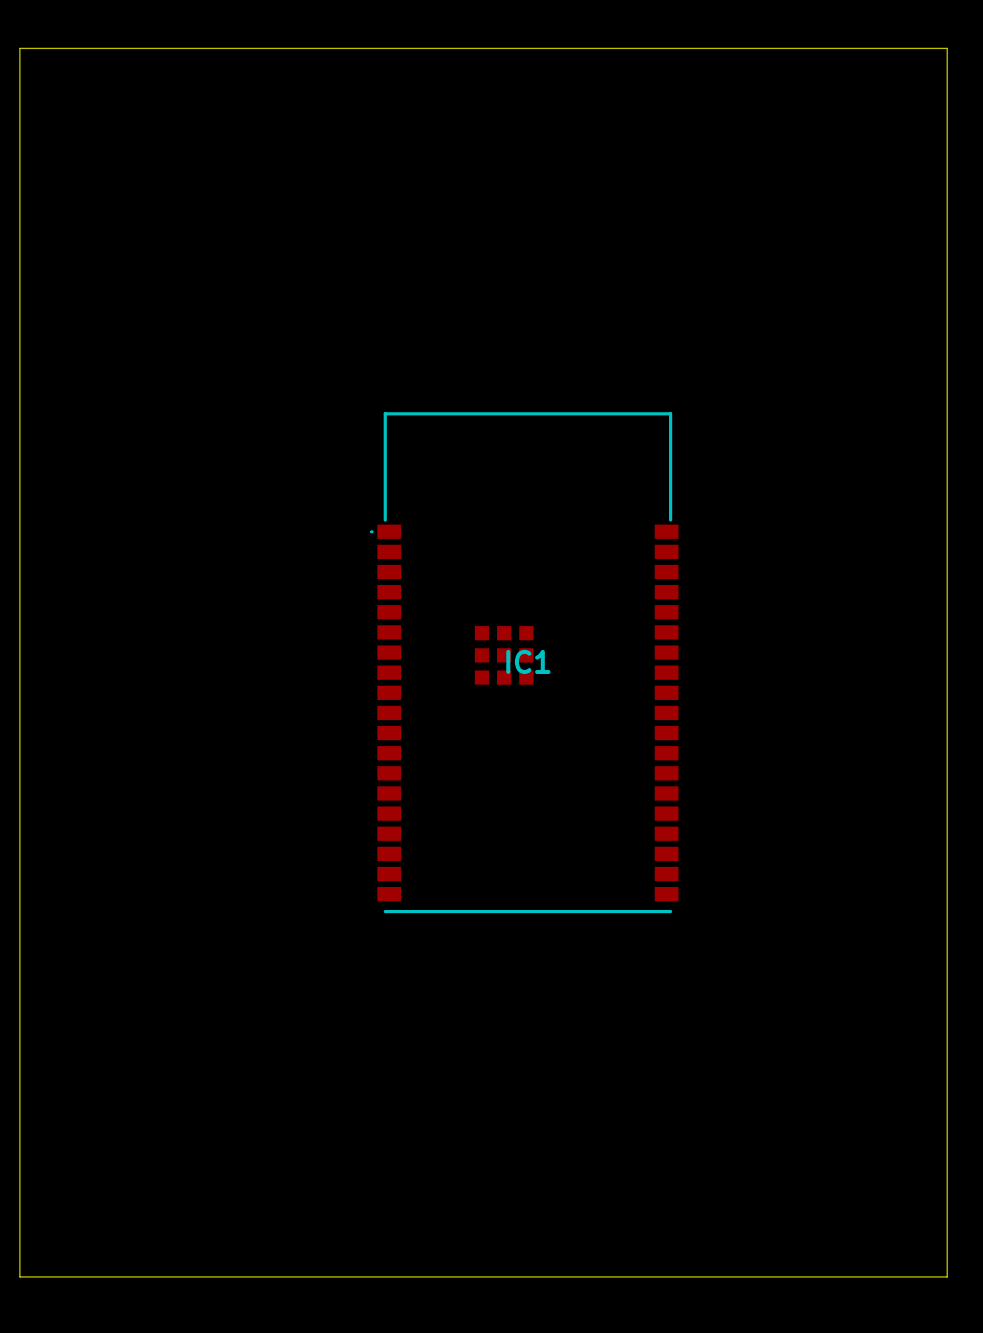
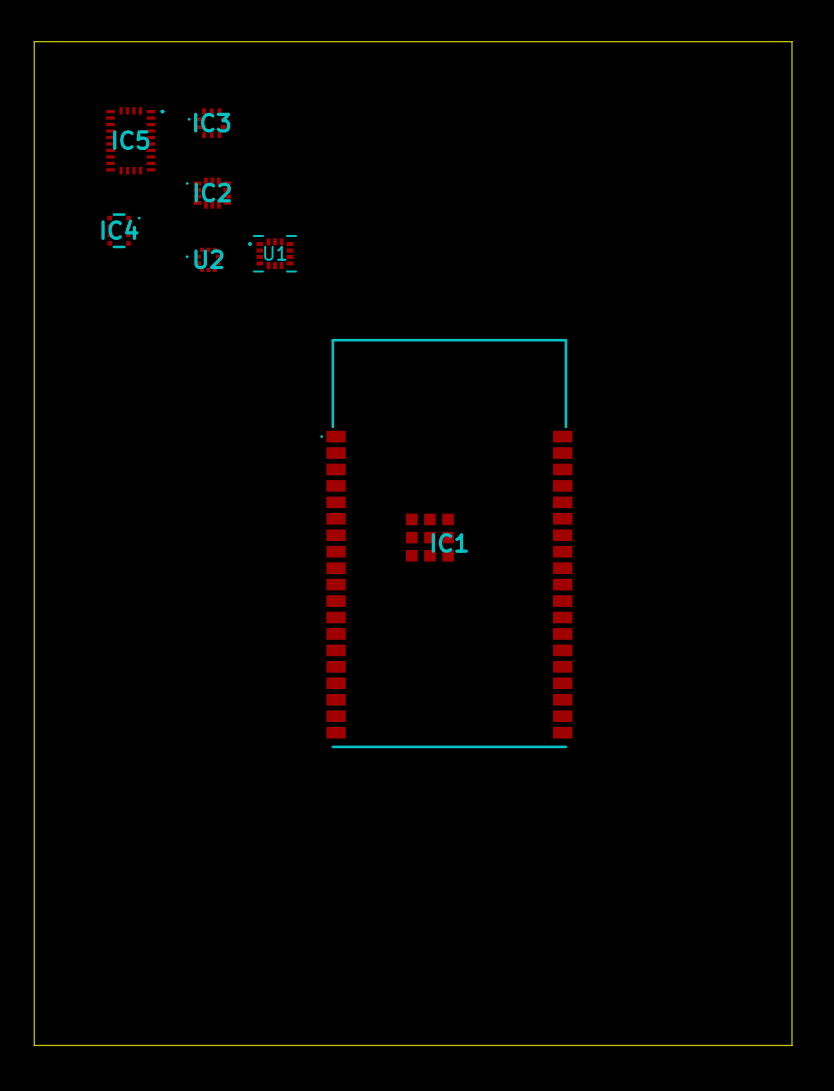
IC3: none -> (207, 123)
IC5: none -> (135, 140)
IC2: none -> (208, 193)
IC4: none -> (123, 230)
U1: none -> (272, 253)
U2: none -> (203, 259)

